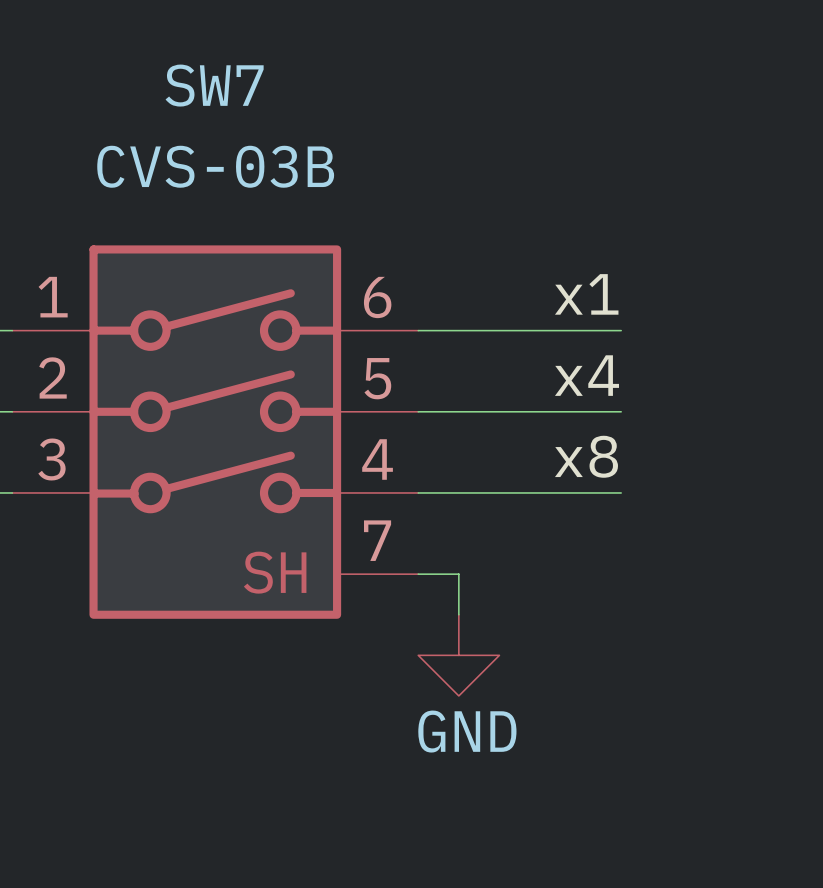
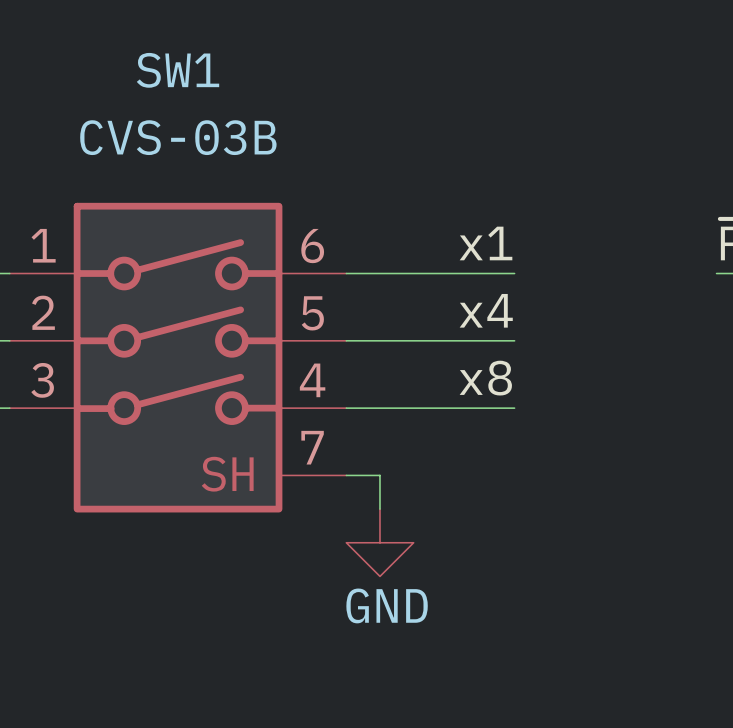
SW7 name: SW7 (214, 85) -> SW1 (178, 70)

